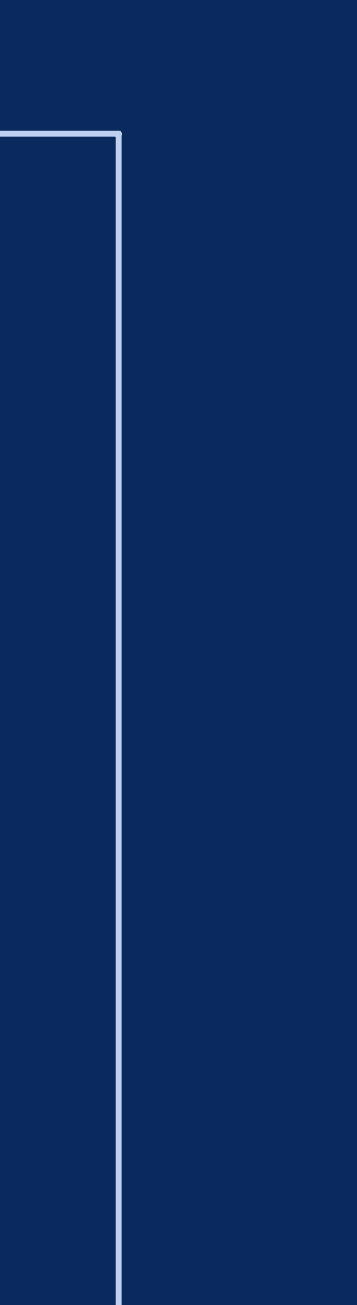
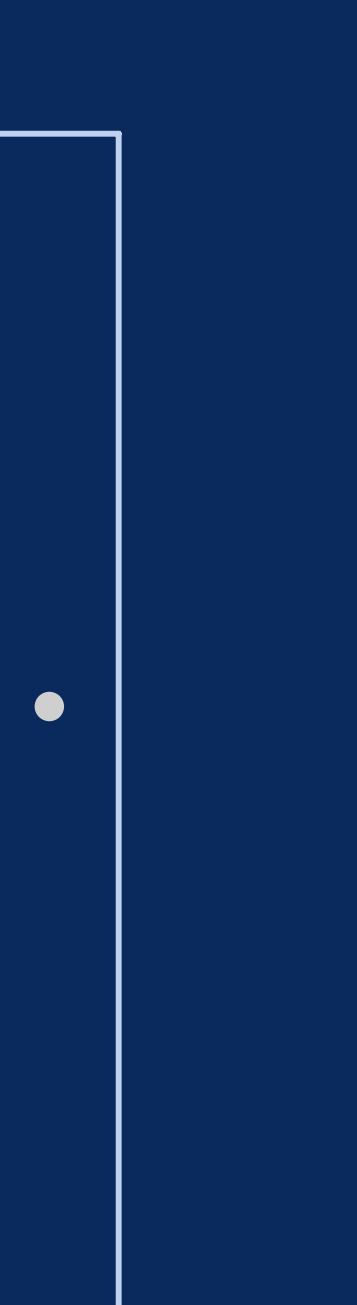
part: none -> (49, 706)

